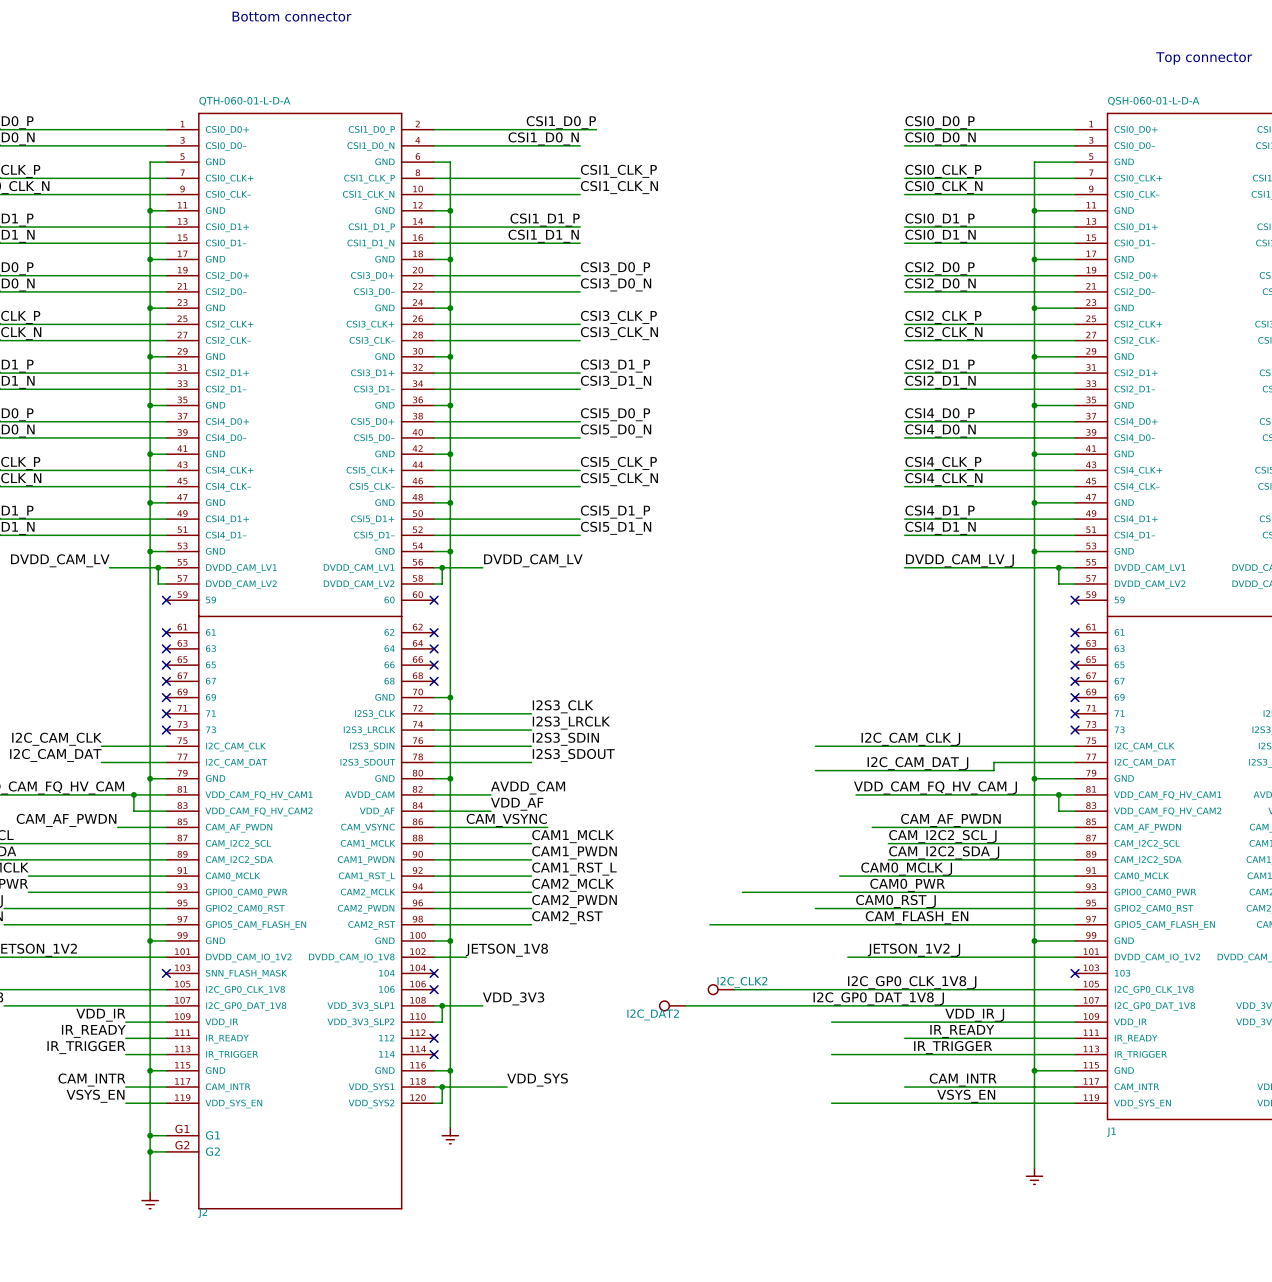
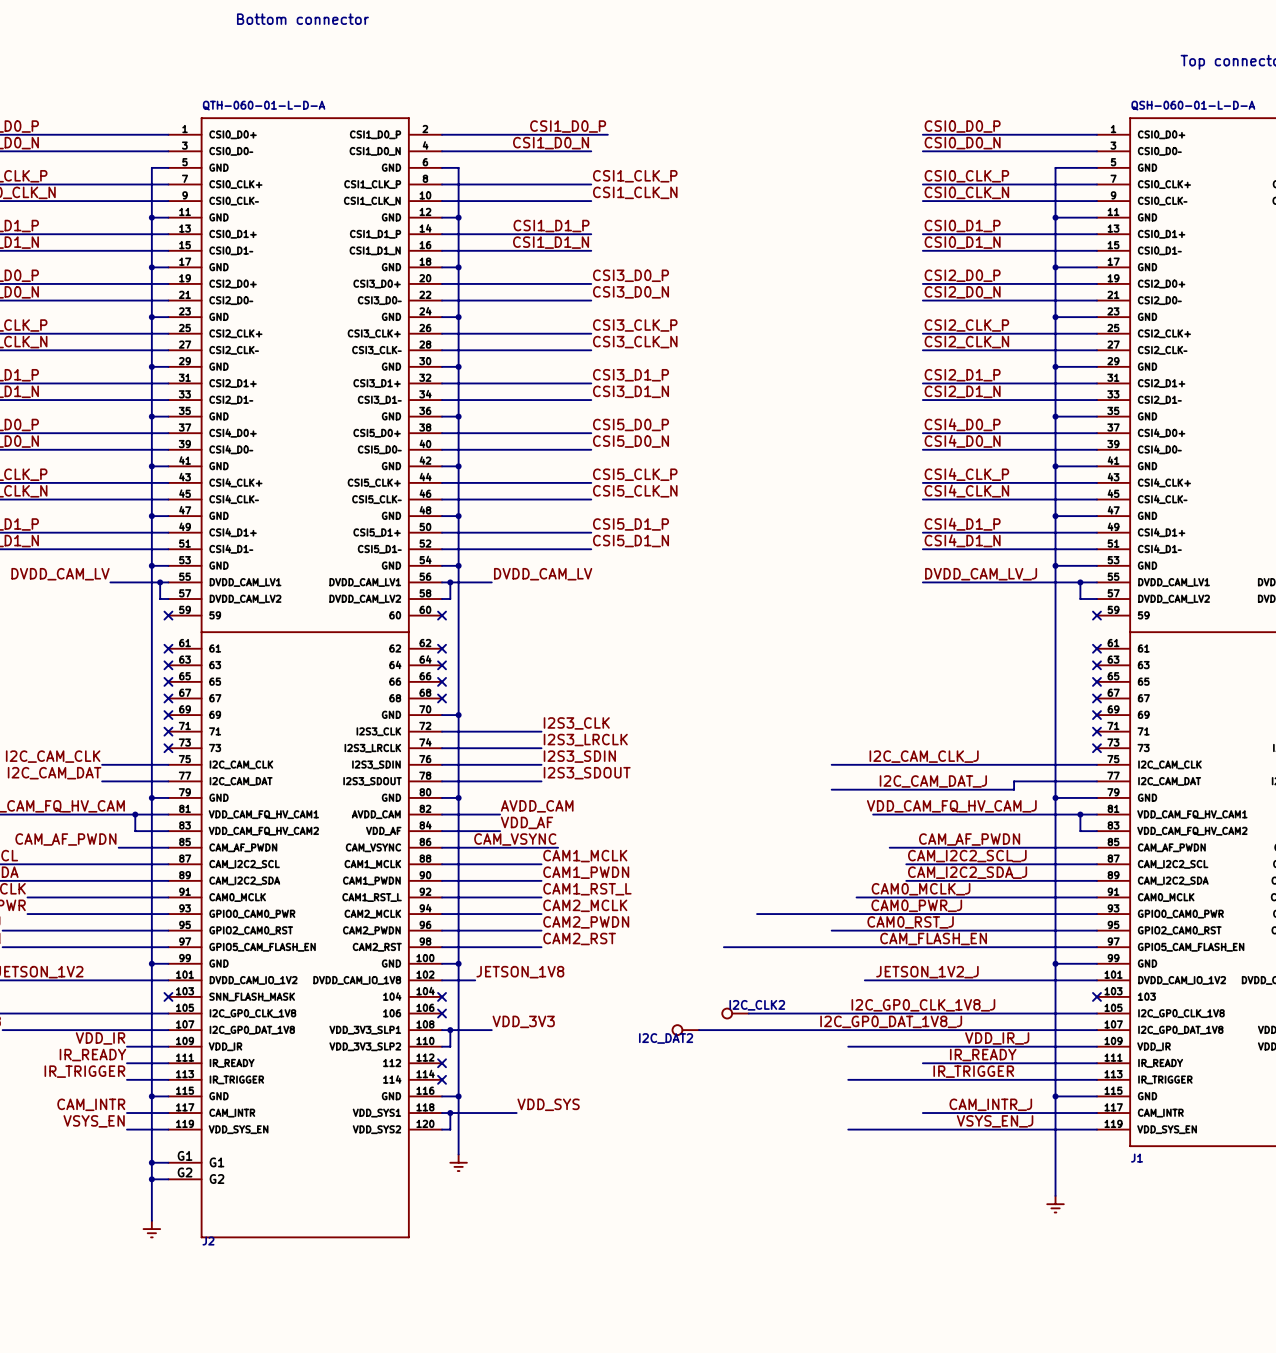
label: CAM0_PWR (907, 885) -> CAM0_PWR_J (916, 905)
label: CAM_INTR (963, 1080) -> CAM_INTR_J (990, 1104)
label: VSYS_EN (966, 1096) -> VSYS_EN_J (995, 1121)

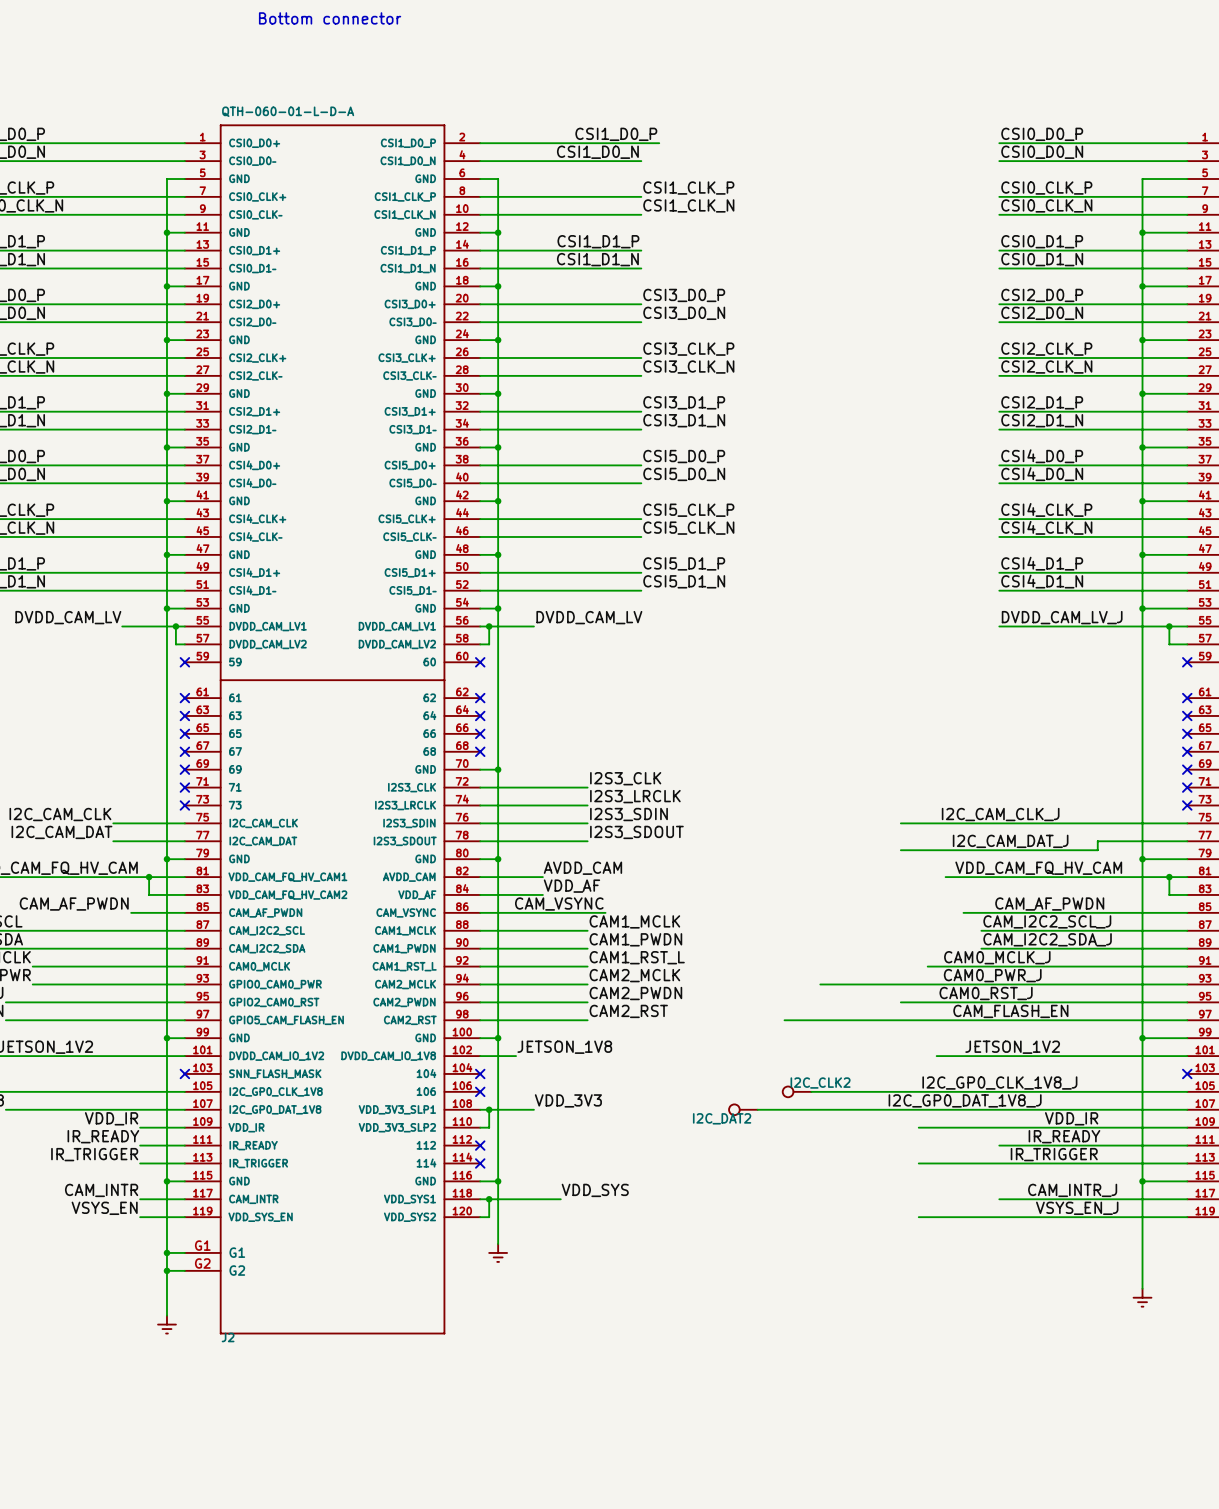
label: VDD_CAM_FQ_HV_CAM_J (951, 806) -> VDD_CAM_FQ_HV_CAM (1038, 868)
label: JETSON_1V2_J (927, 972) -> JETSON_1V2 (1012, 1047)
label: VDD_IR_J (997, 1038) -> VDD_IR (1071, 1118)

